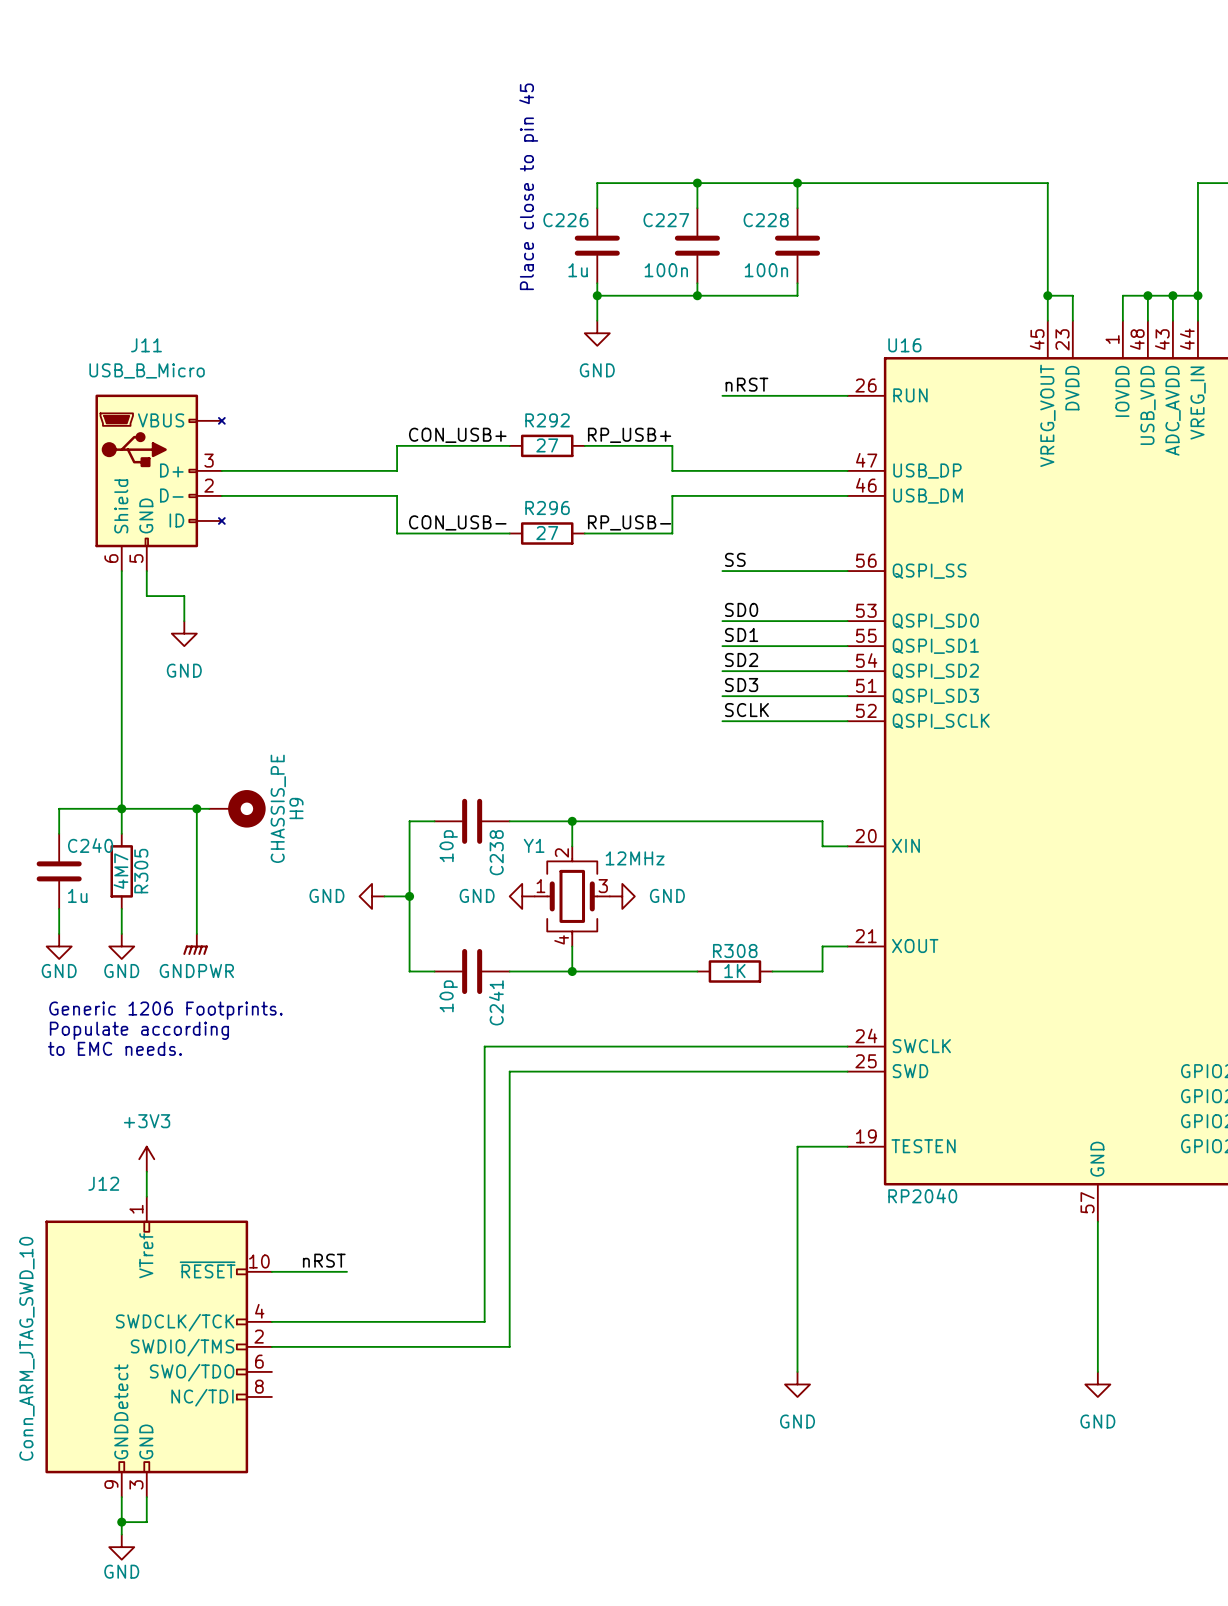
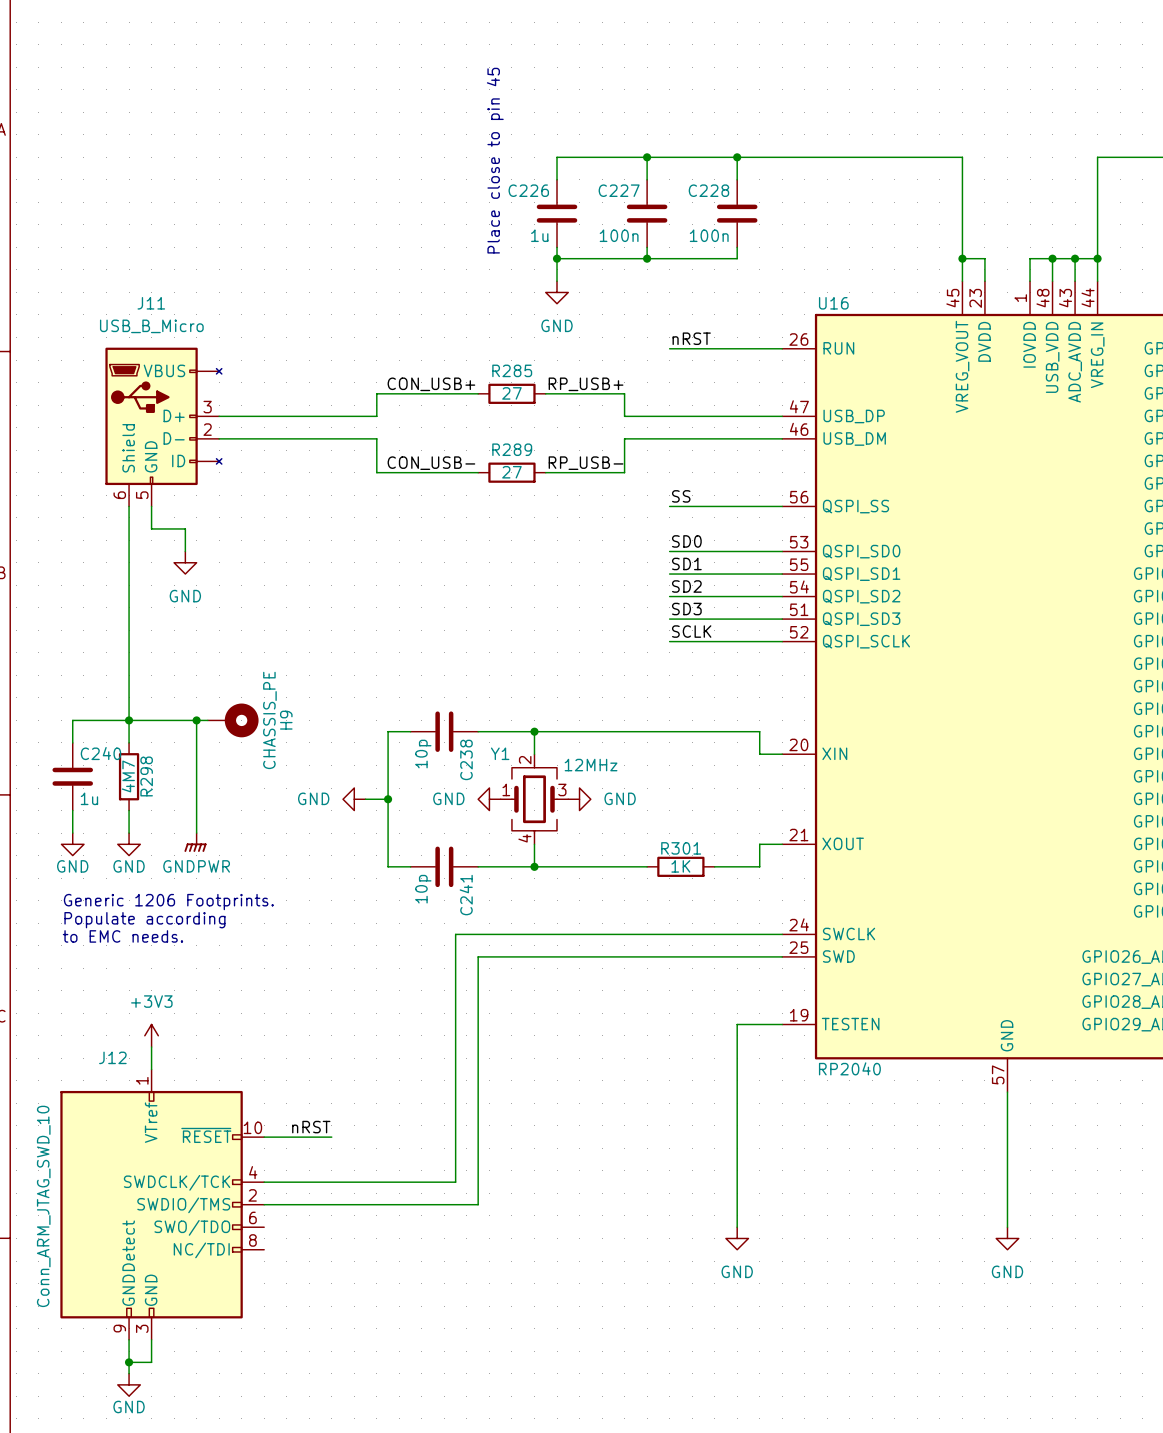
R292 name: R292 (547, 420) -> R285 (512, 370)
R296 name: R296 (547, 508) -> R289 (512, 449)
R305 name: R305 (141, 871) -> R298 (146, 776)
R308 name: R308 (735, 951) -> R301 (681, 848)

